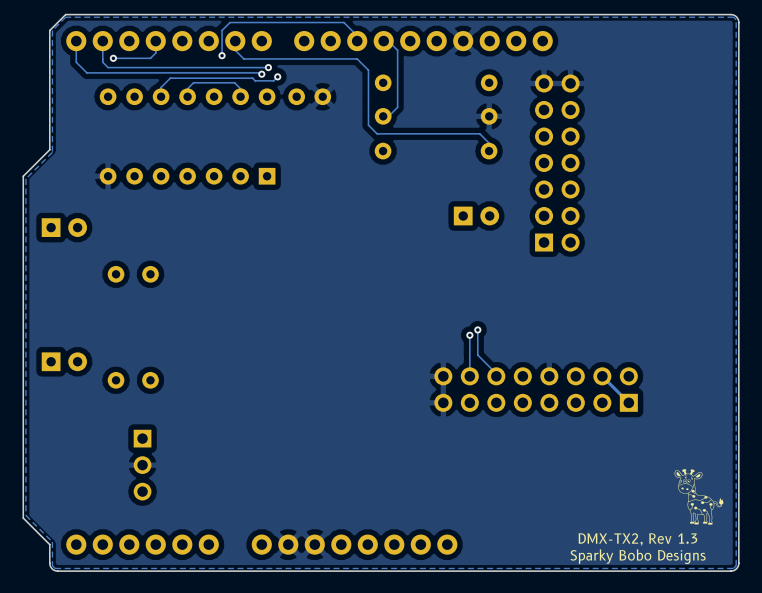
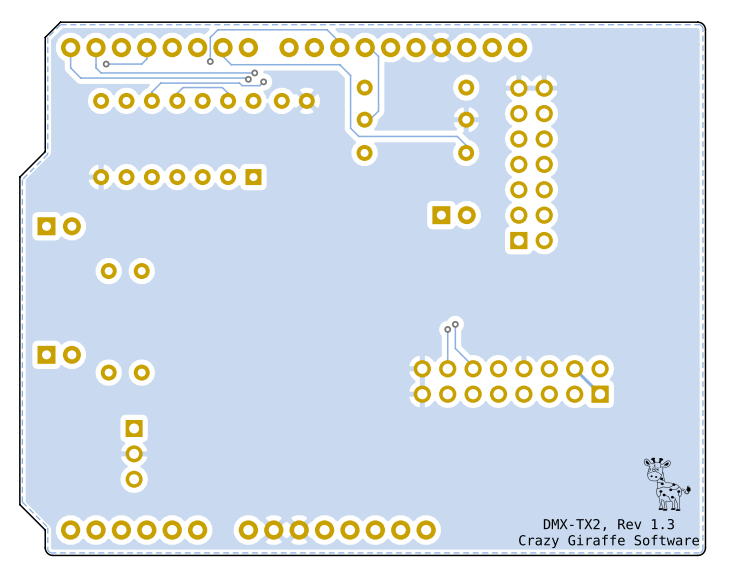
text: Sparky Bobo Designs (638, 556) -> Crazy Giraffe Software (609, 541)

